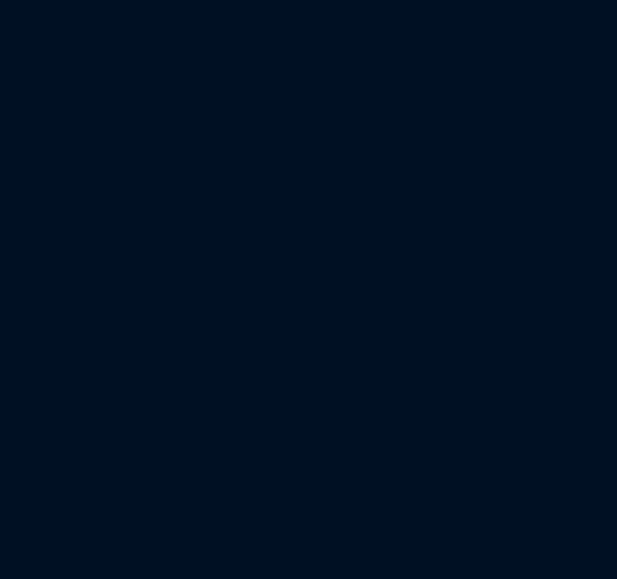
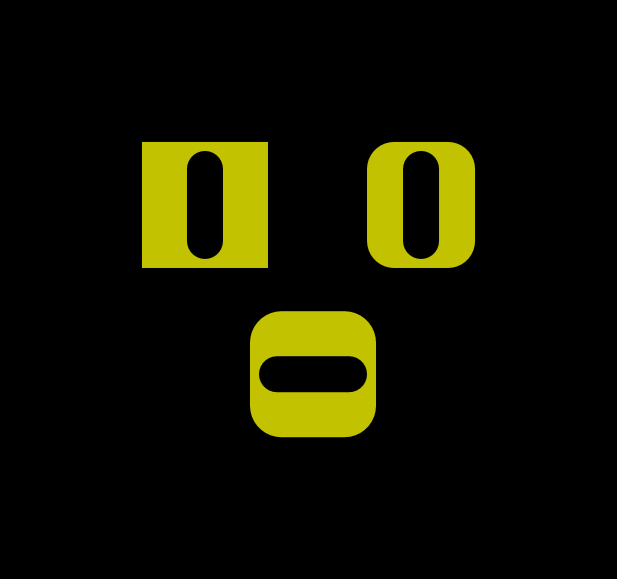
part: none -> (308, 289)

